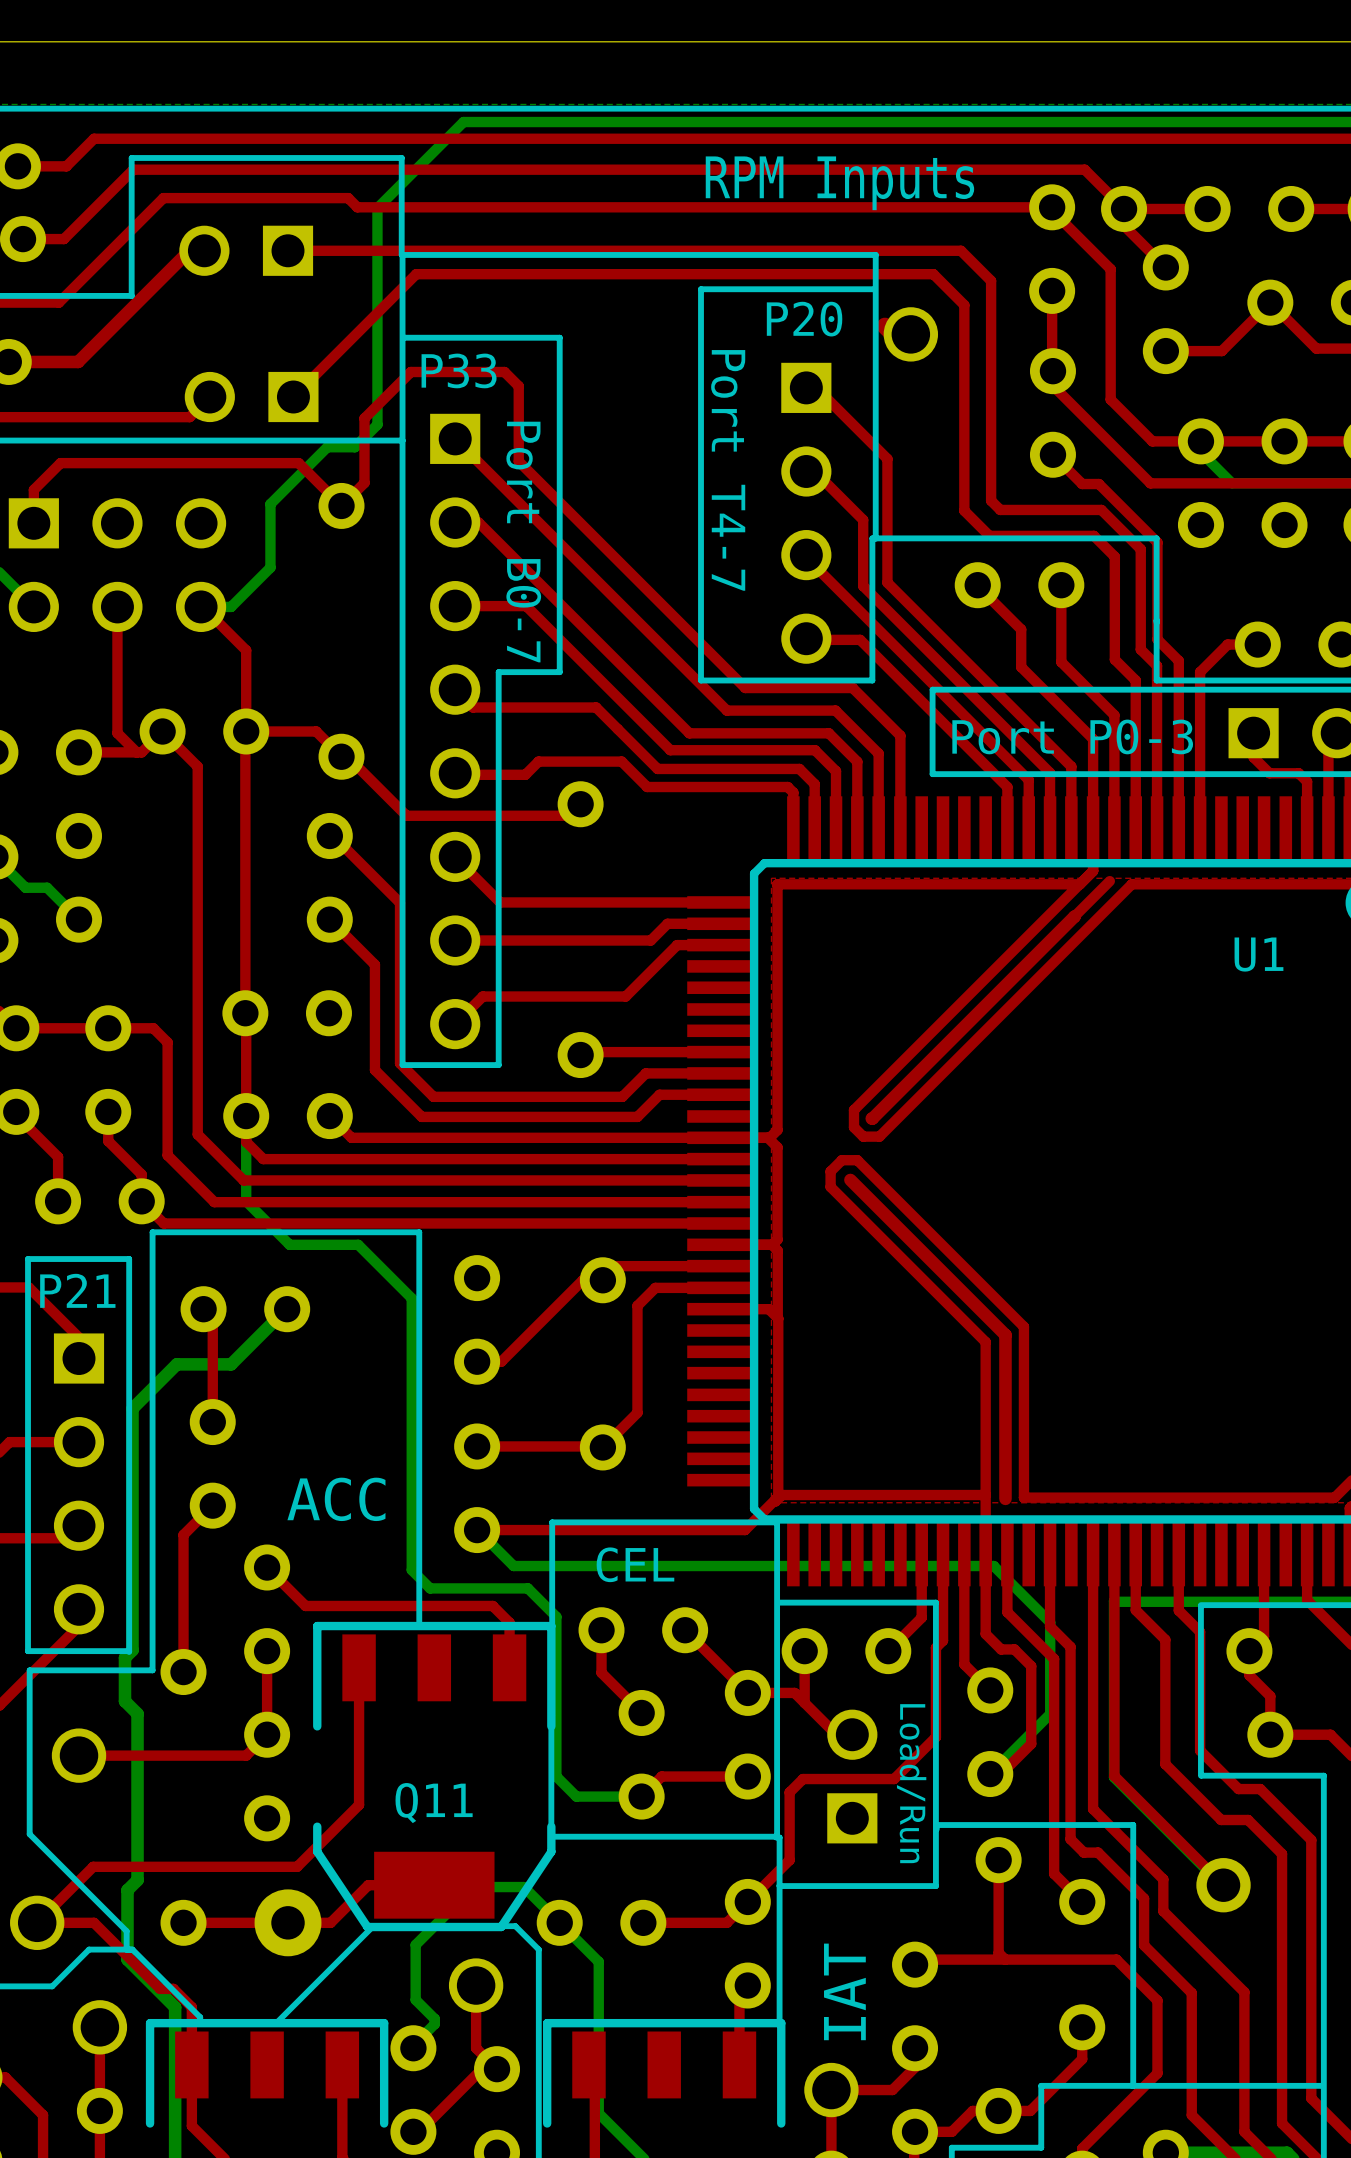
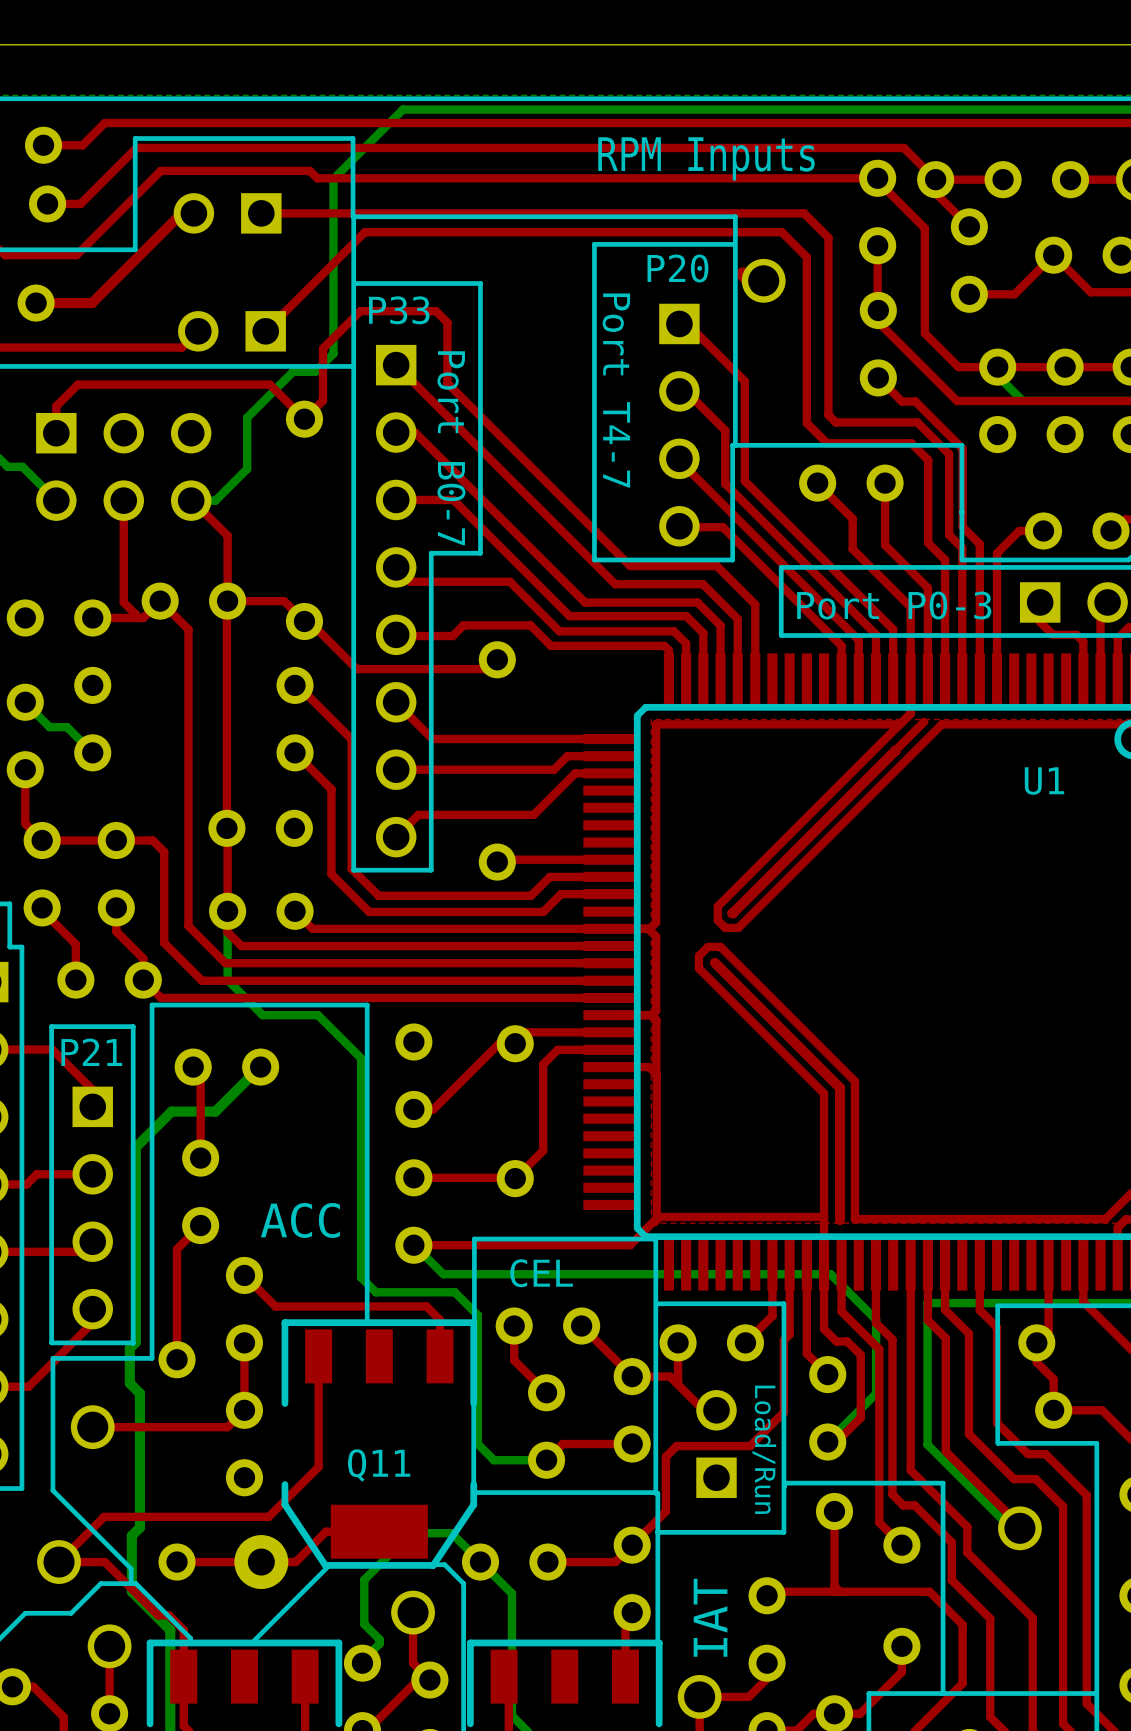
top track: (1114, 1623) (1114, 1776) (1223, 1885) -> (927, 1320) (945, 1338) (945, 1451) (1019, 1525) (1019, 1528)
part footprint: [1196, 1858, 1251, 1913] -> [998, 1506, 1042, 1551]

